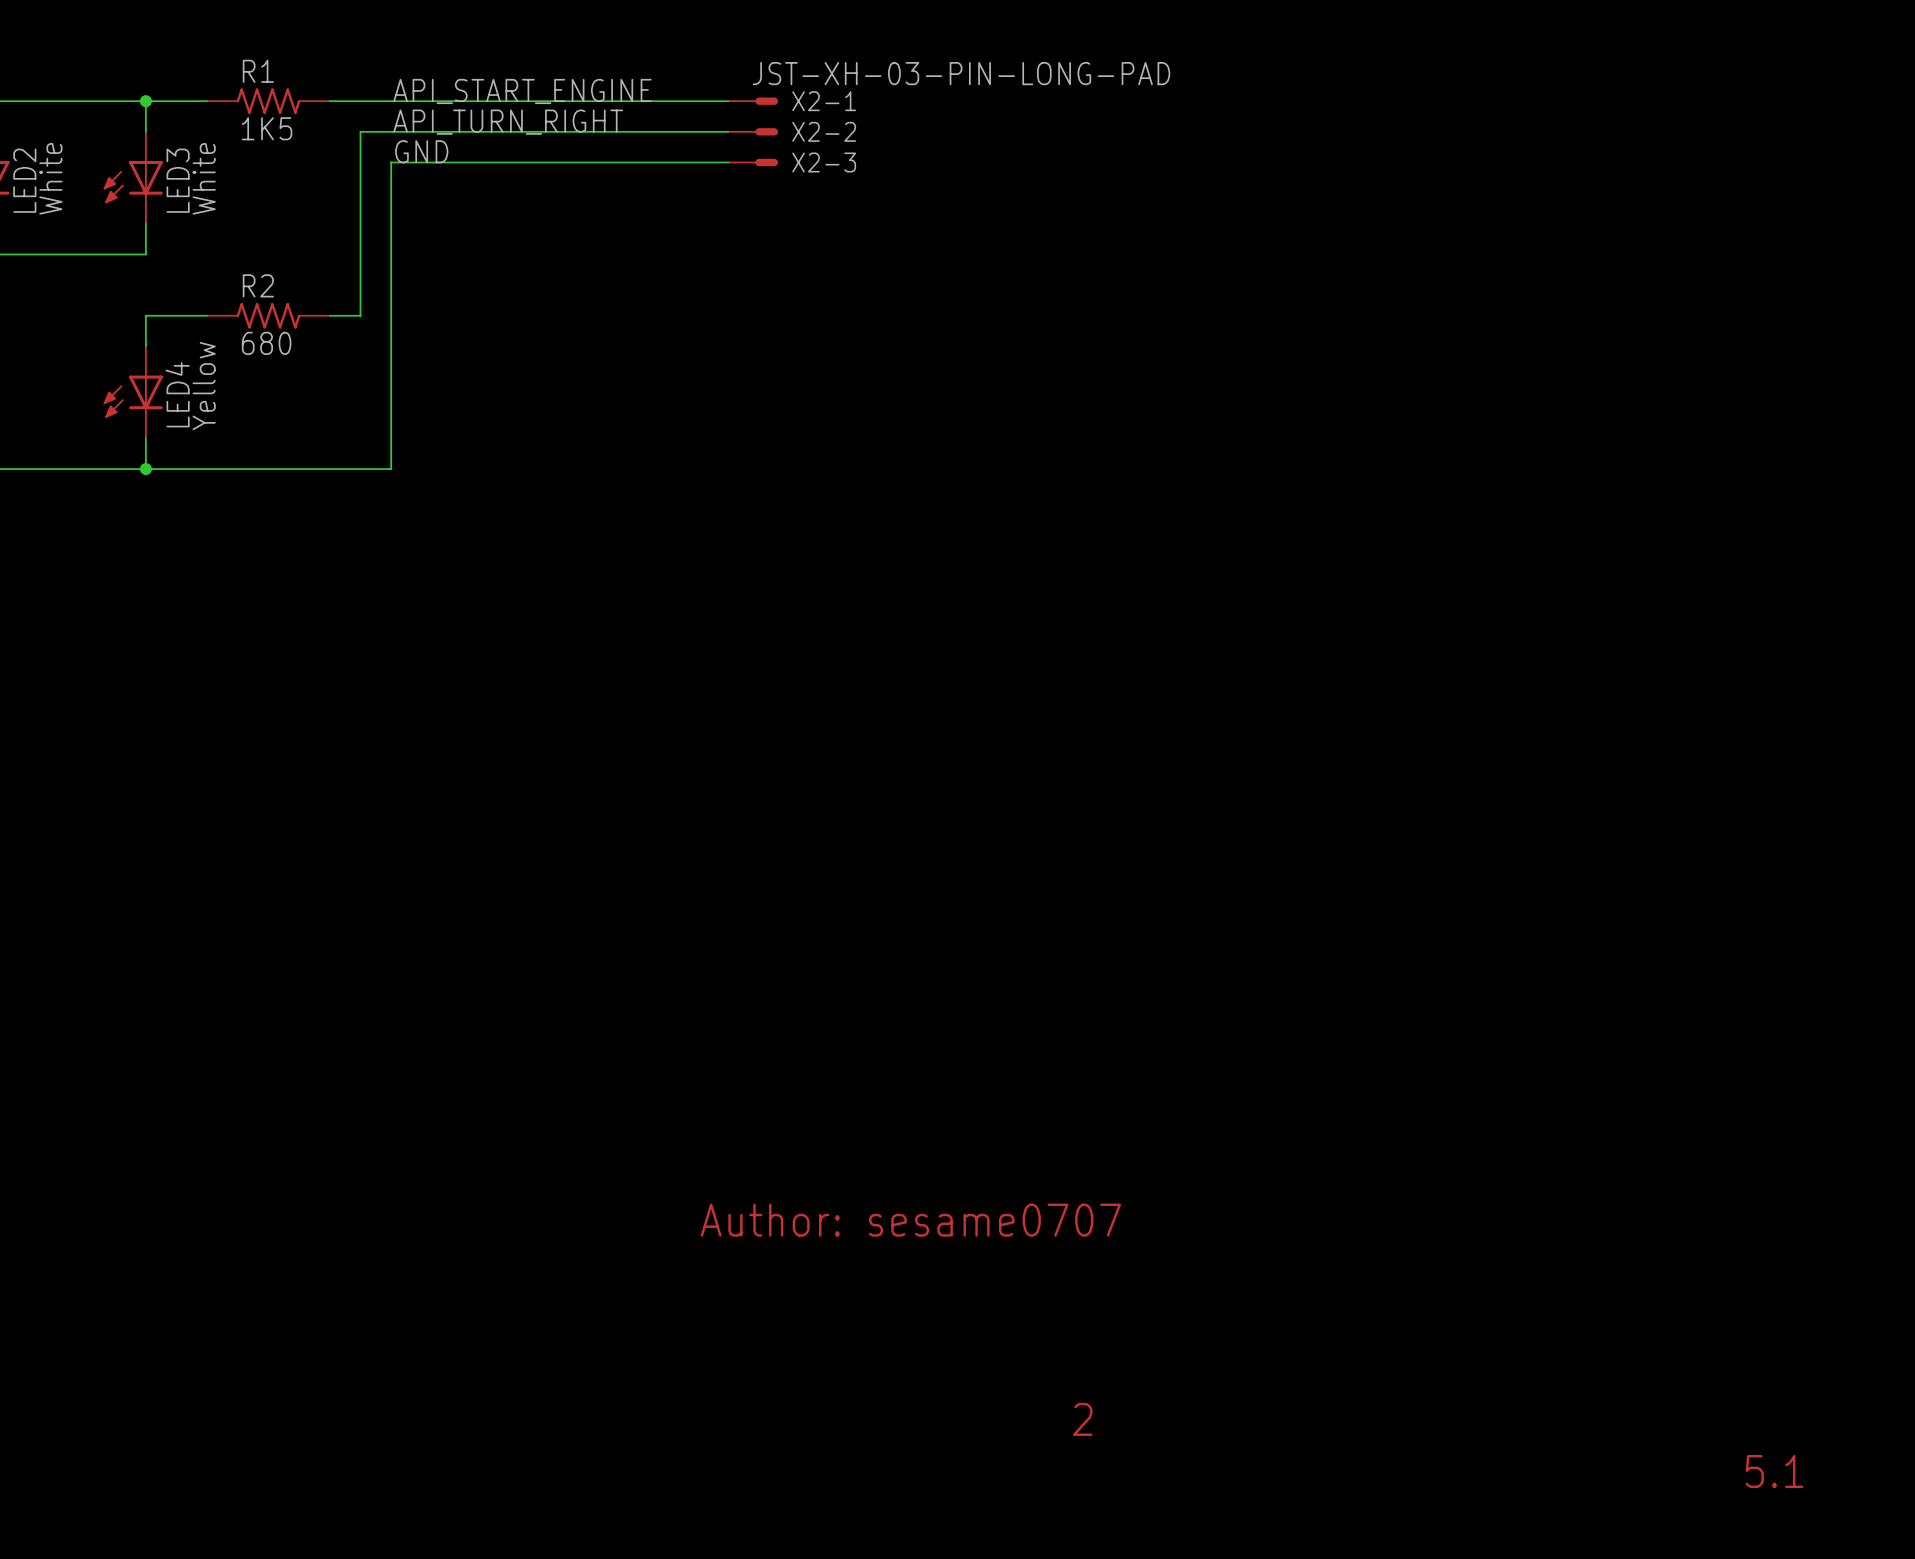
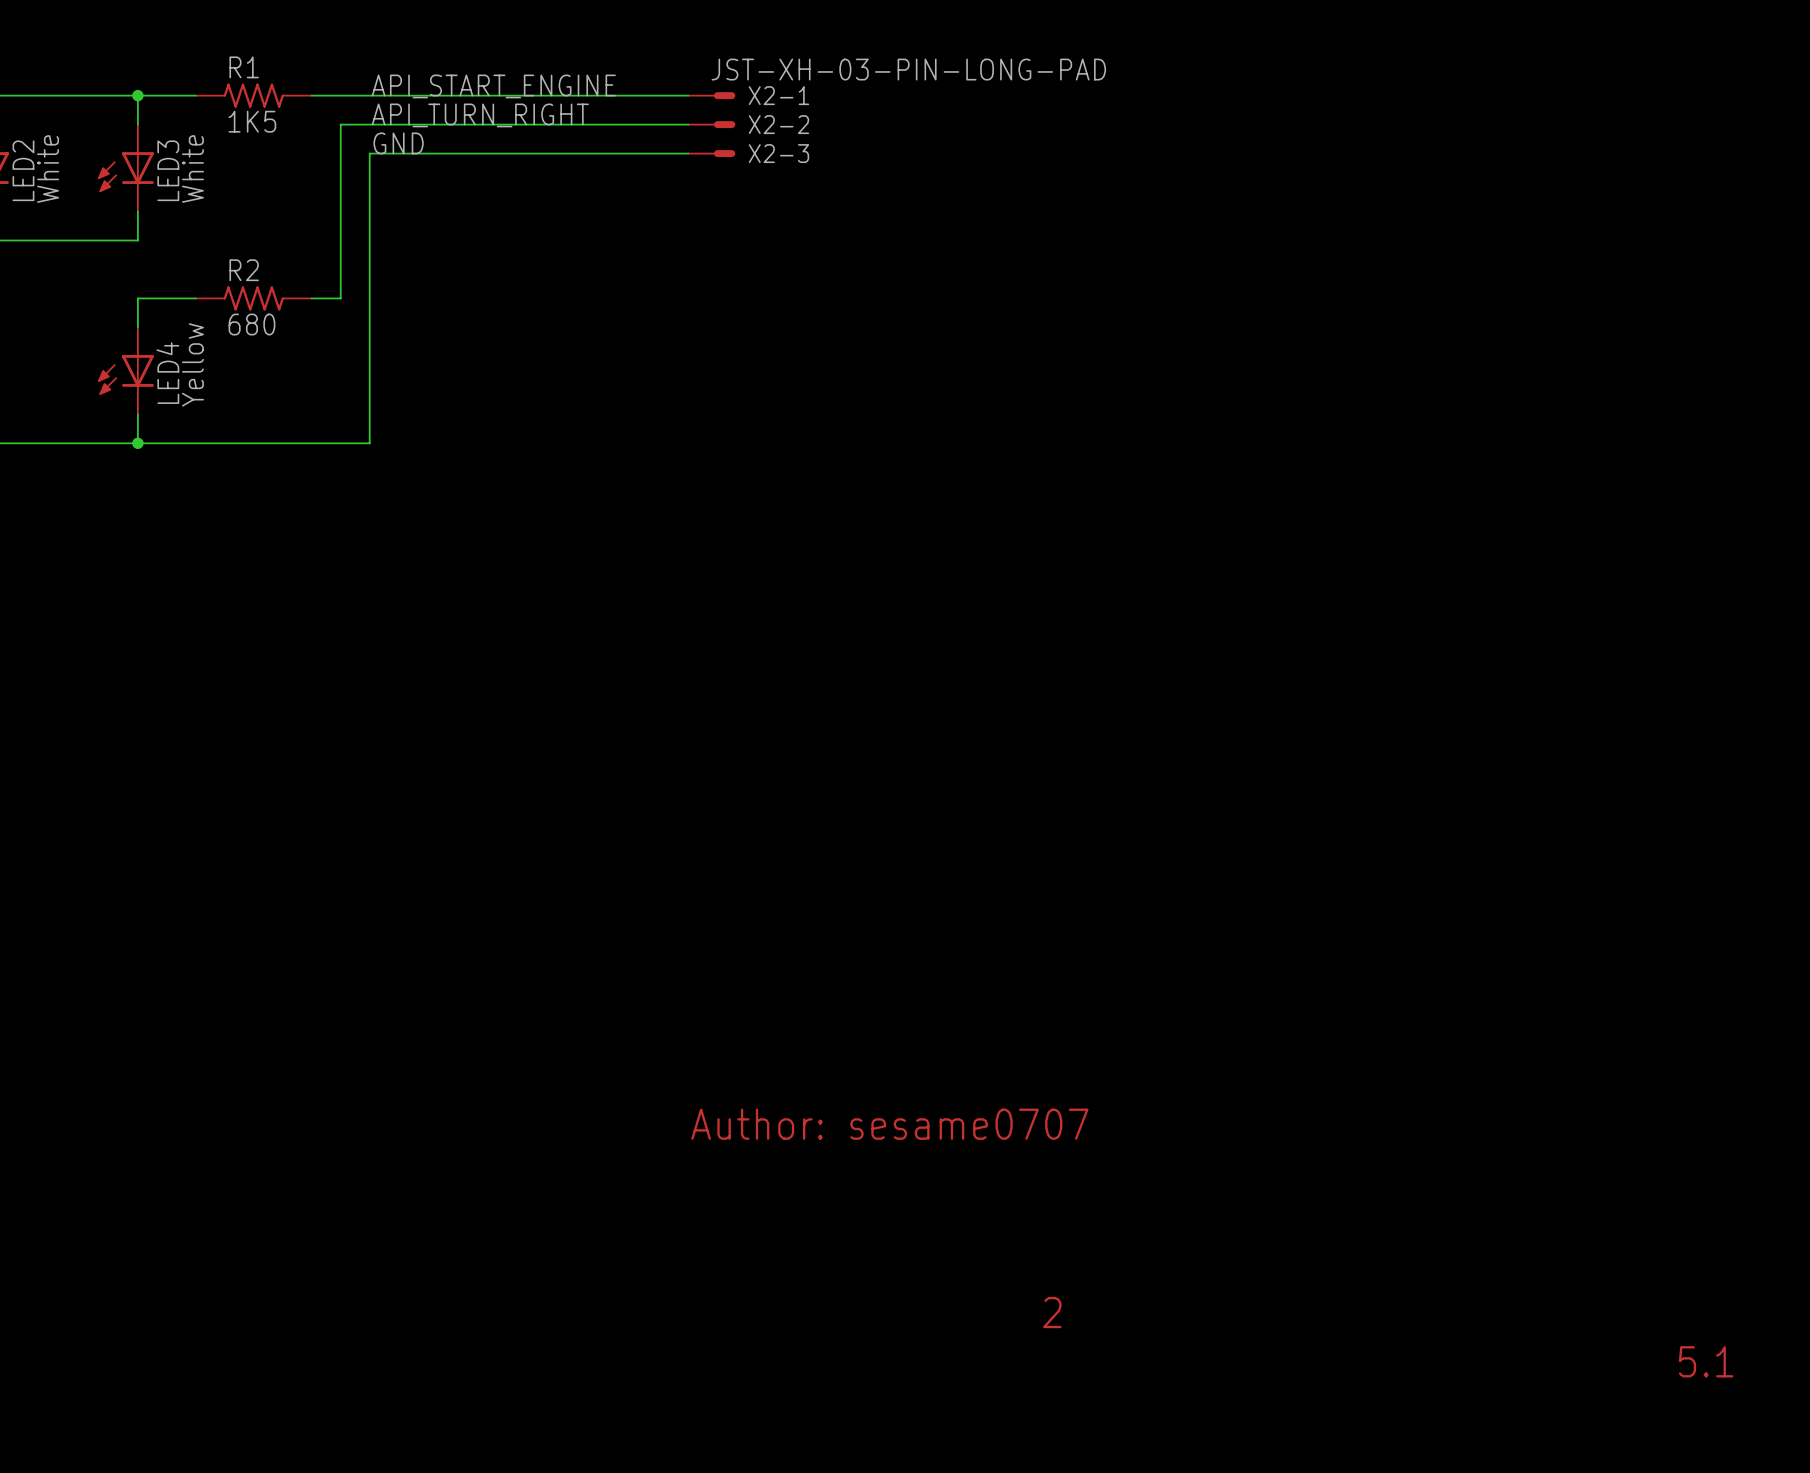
text position: Author: sesame0707 (910, 1220) -> Author: sesame0707 (889, 1124)
text position: 2 (1082, 1419) -> 2 (1052, 1312)
text position: 5.1 (1774, 1471) -> 5.1 (1706, 1361)

